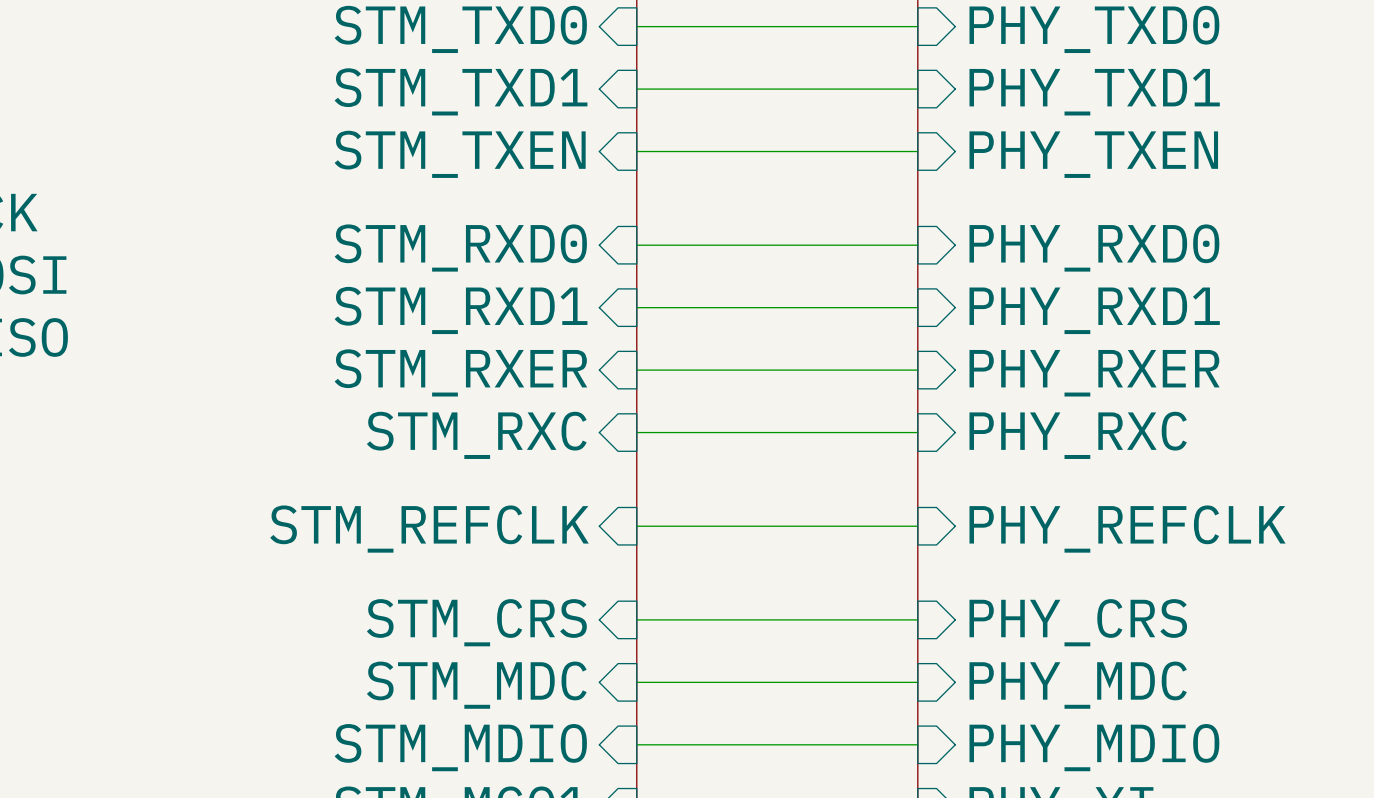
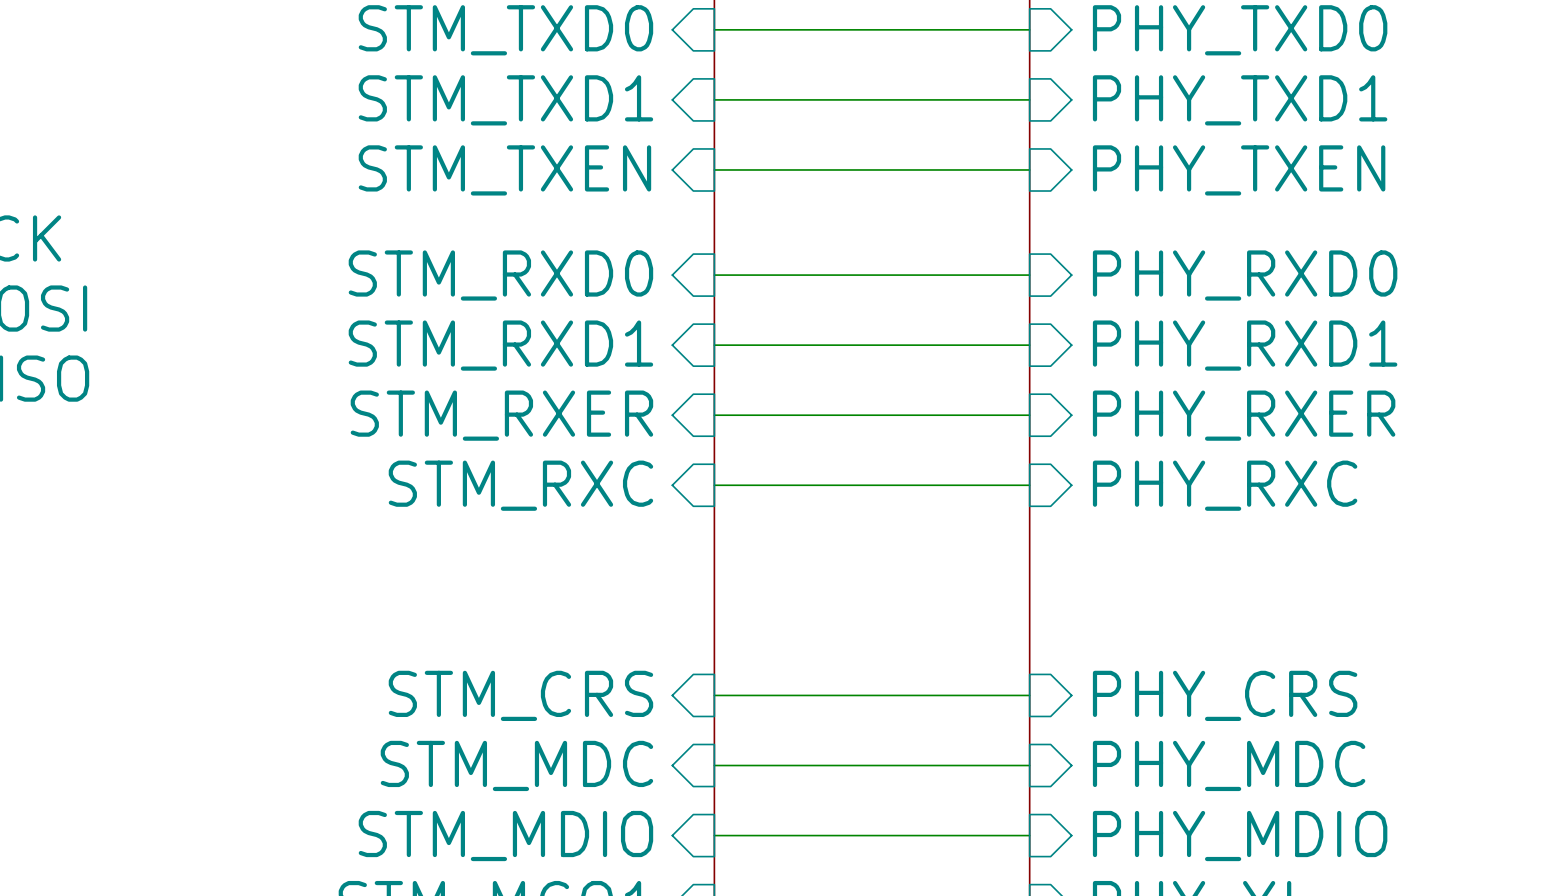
wire: (636, 526) (917, 526) -> none
sheet pin: STM_REFCLK (429, 529) -> none
sheet pin: PHY_REFCLK (1127, 529) -> none

